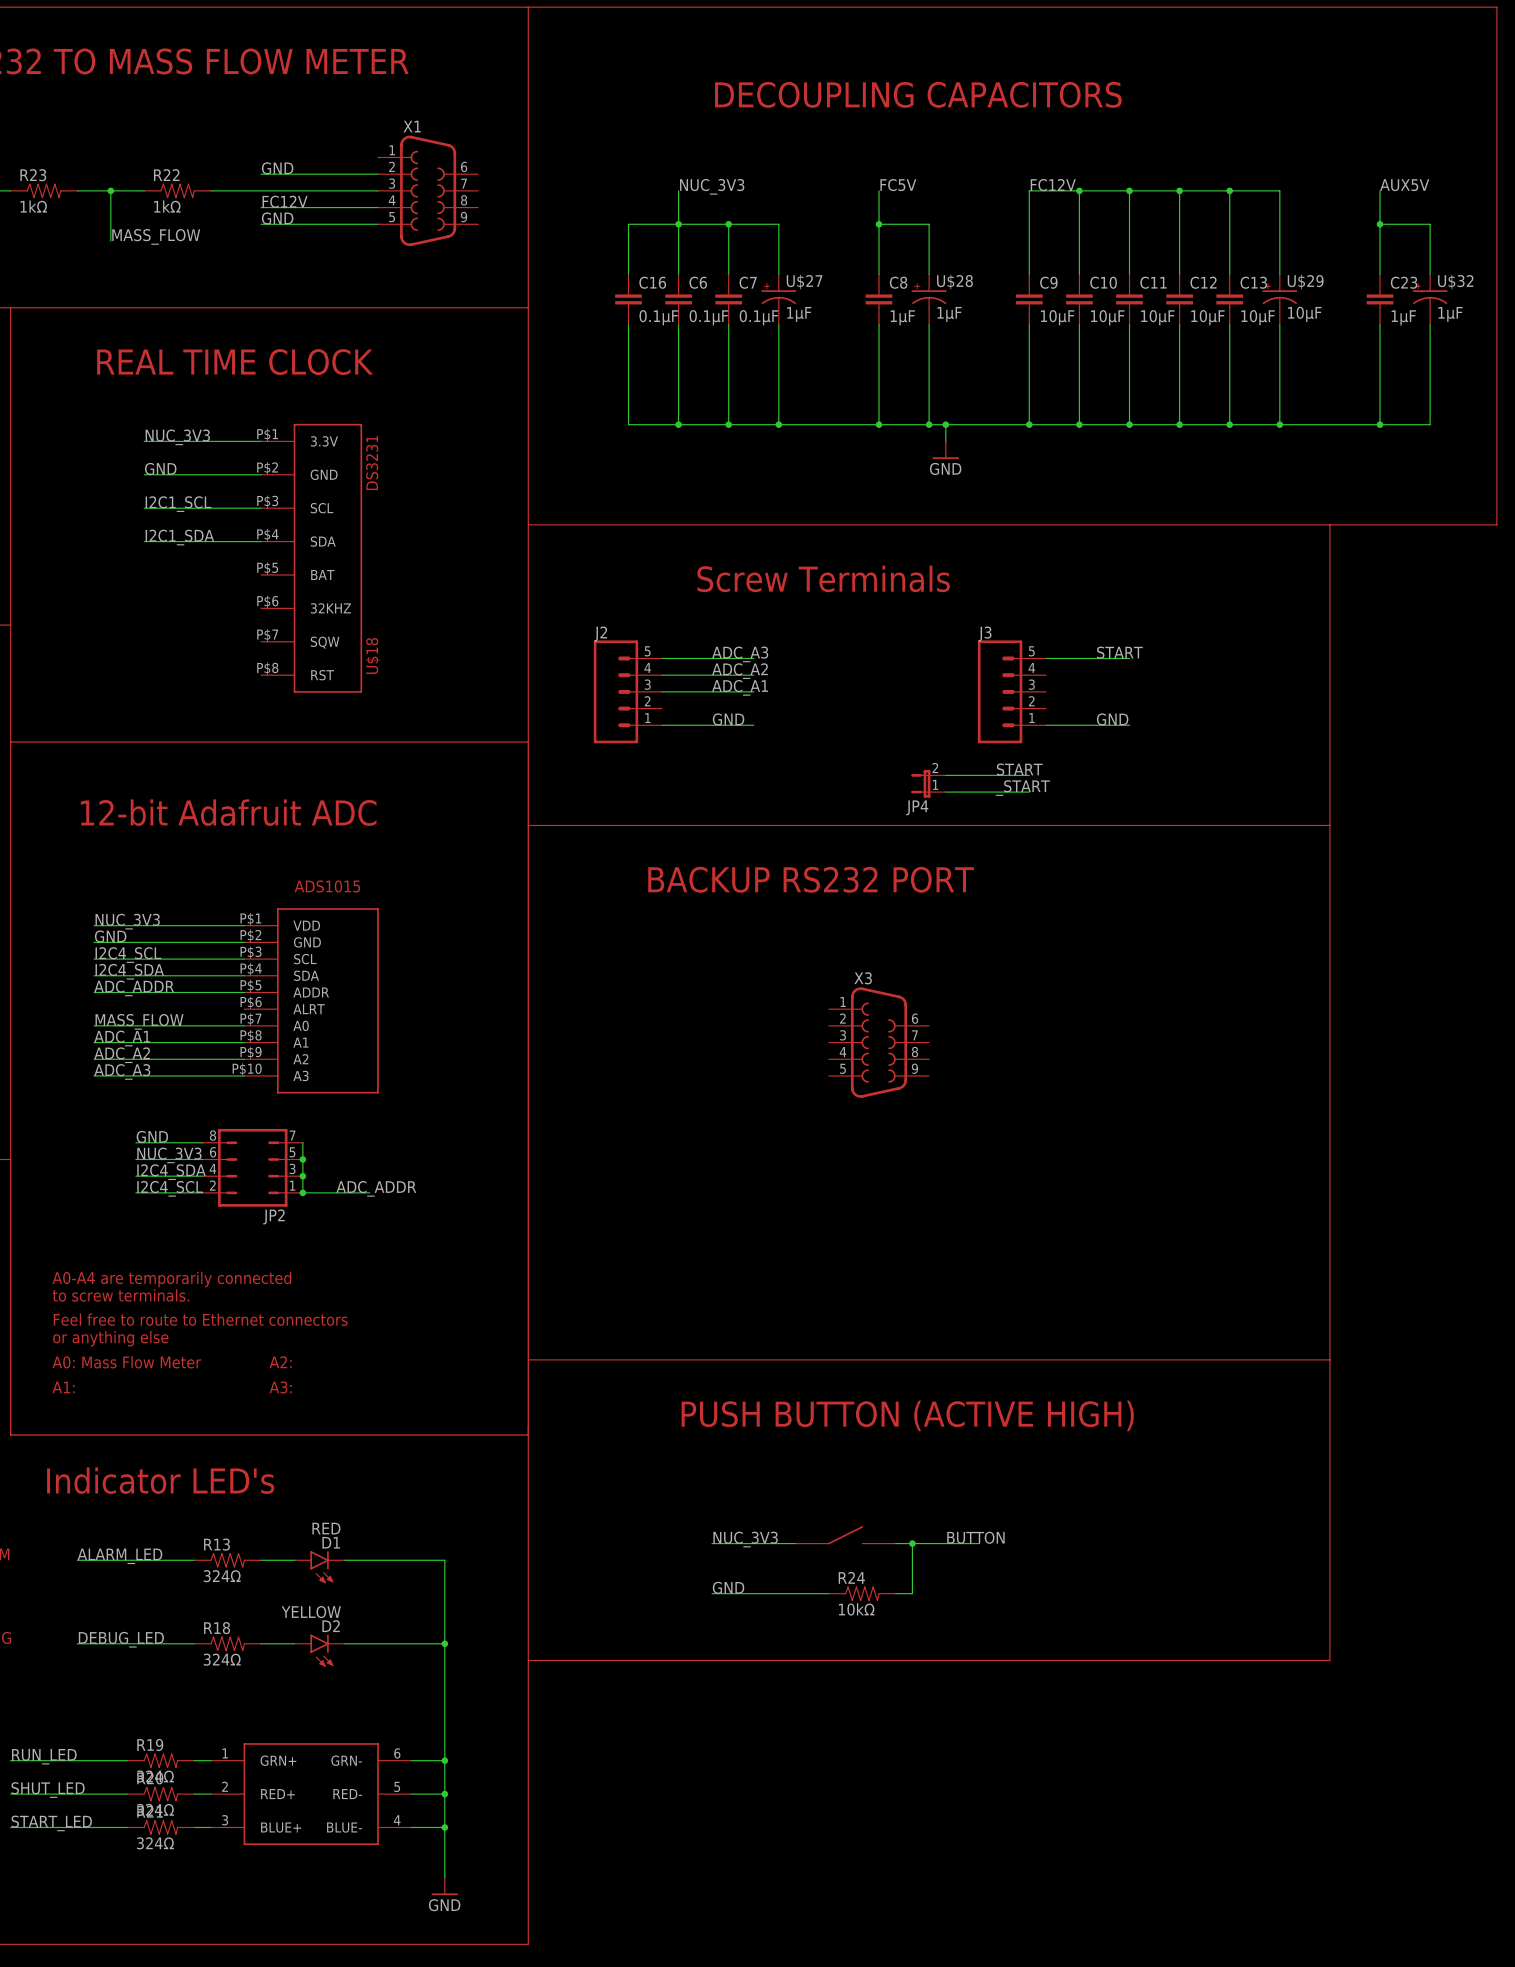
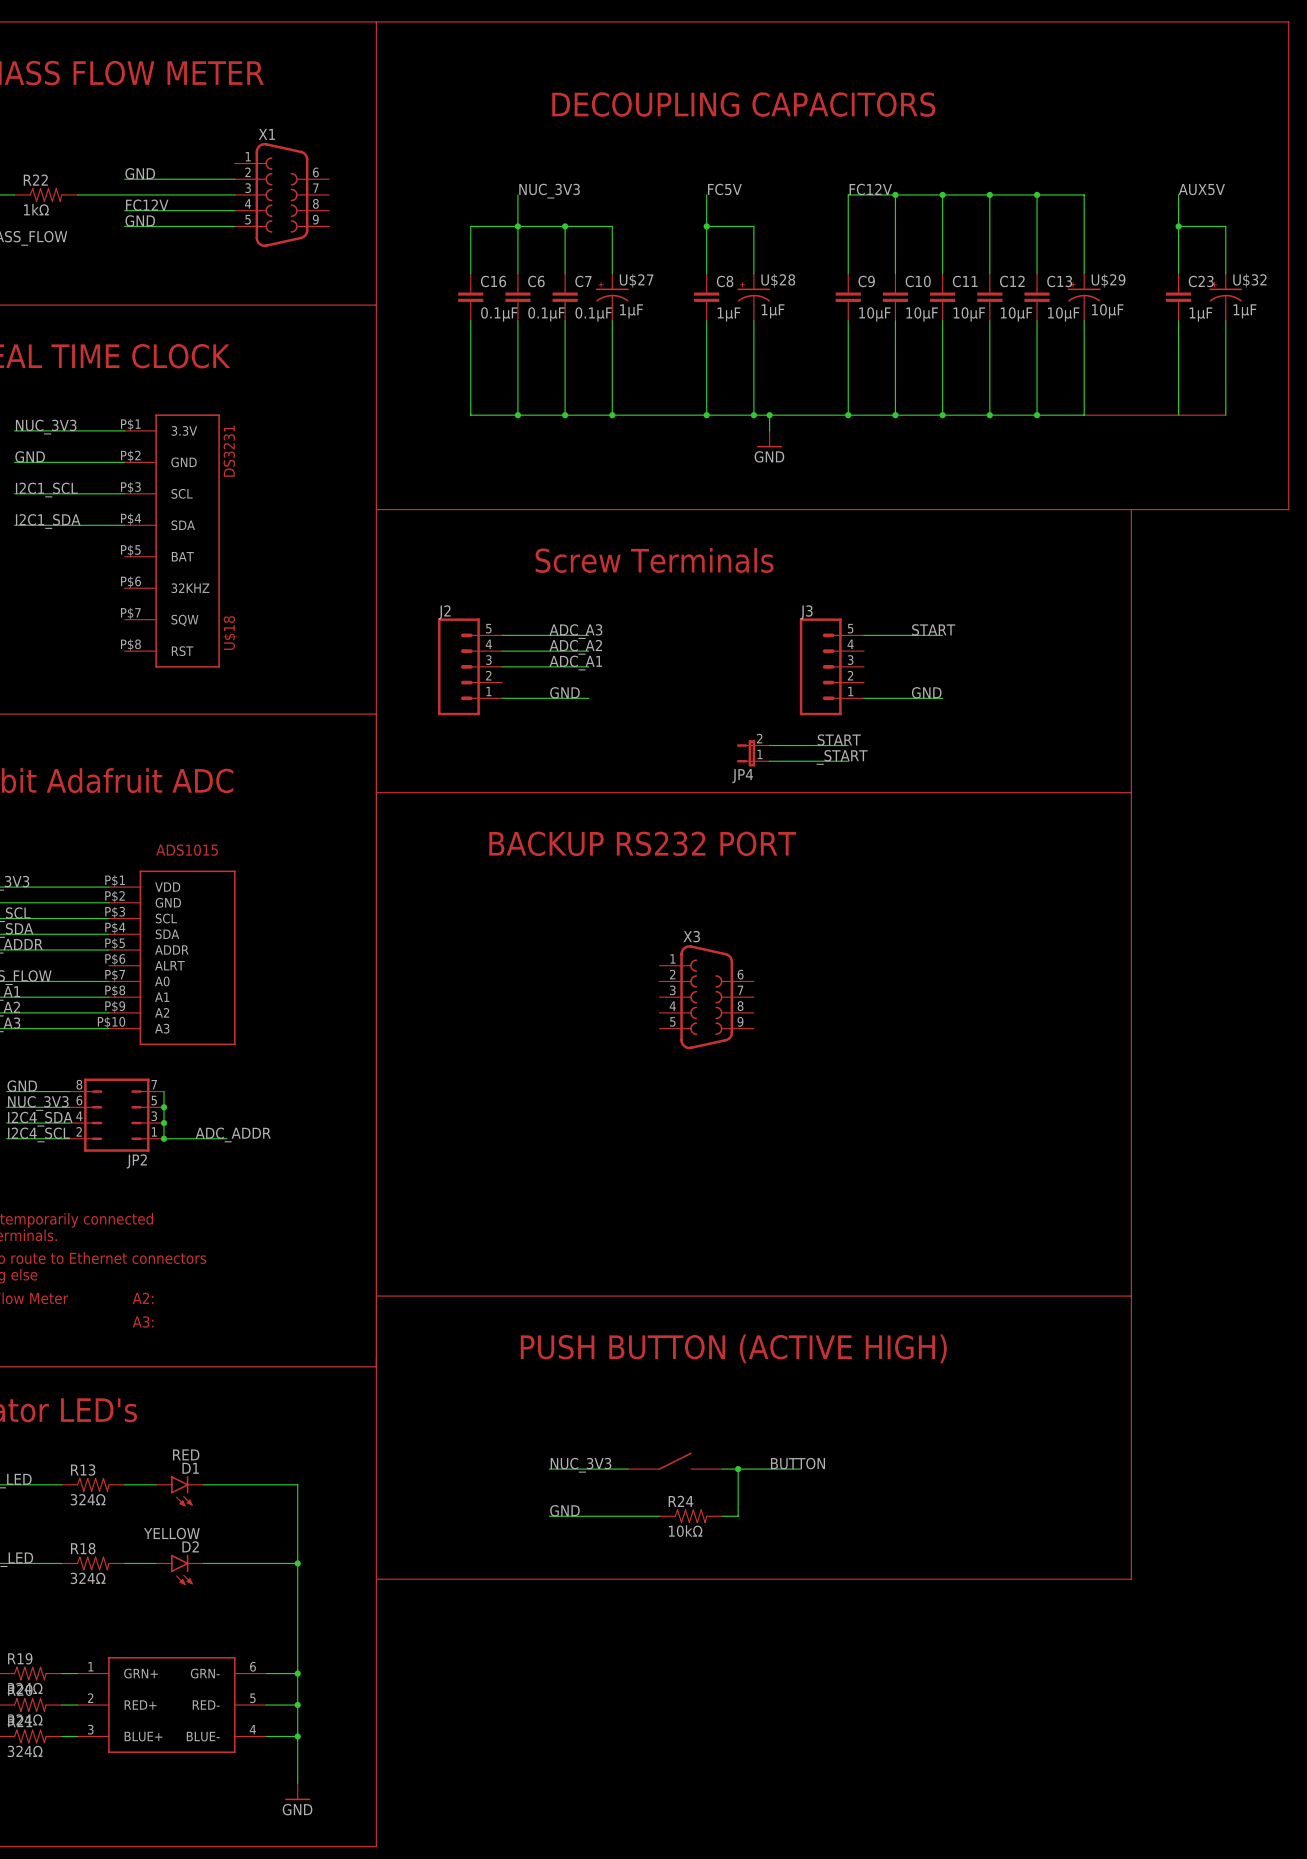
line: none -> (1084, 415) (1225, 415)
junction: (1279, 424) -> none
junction: (1380, 424) -> none

